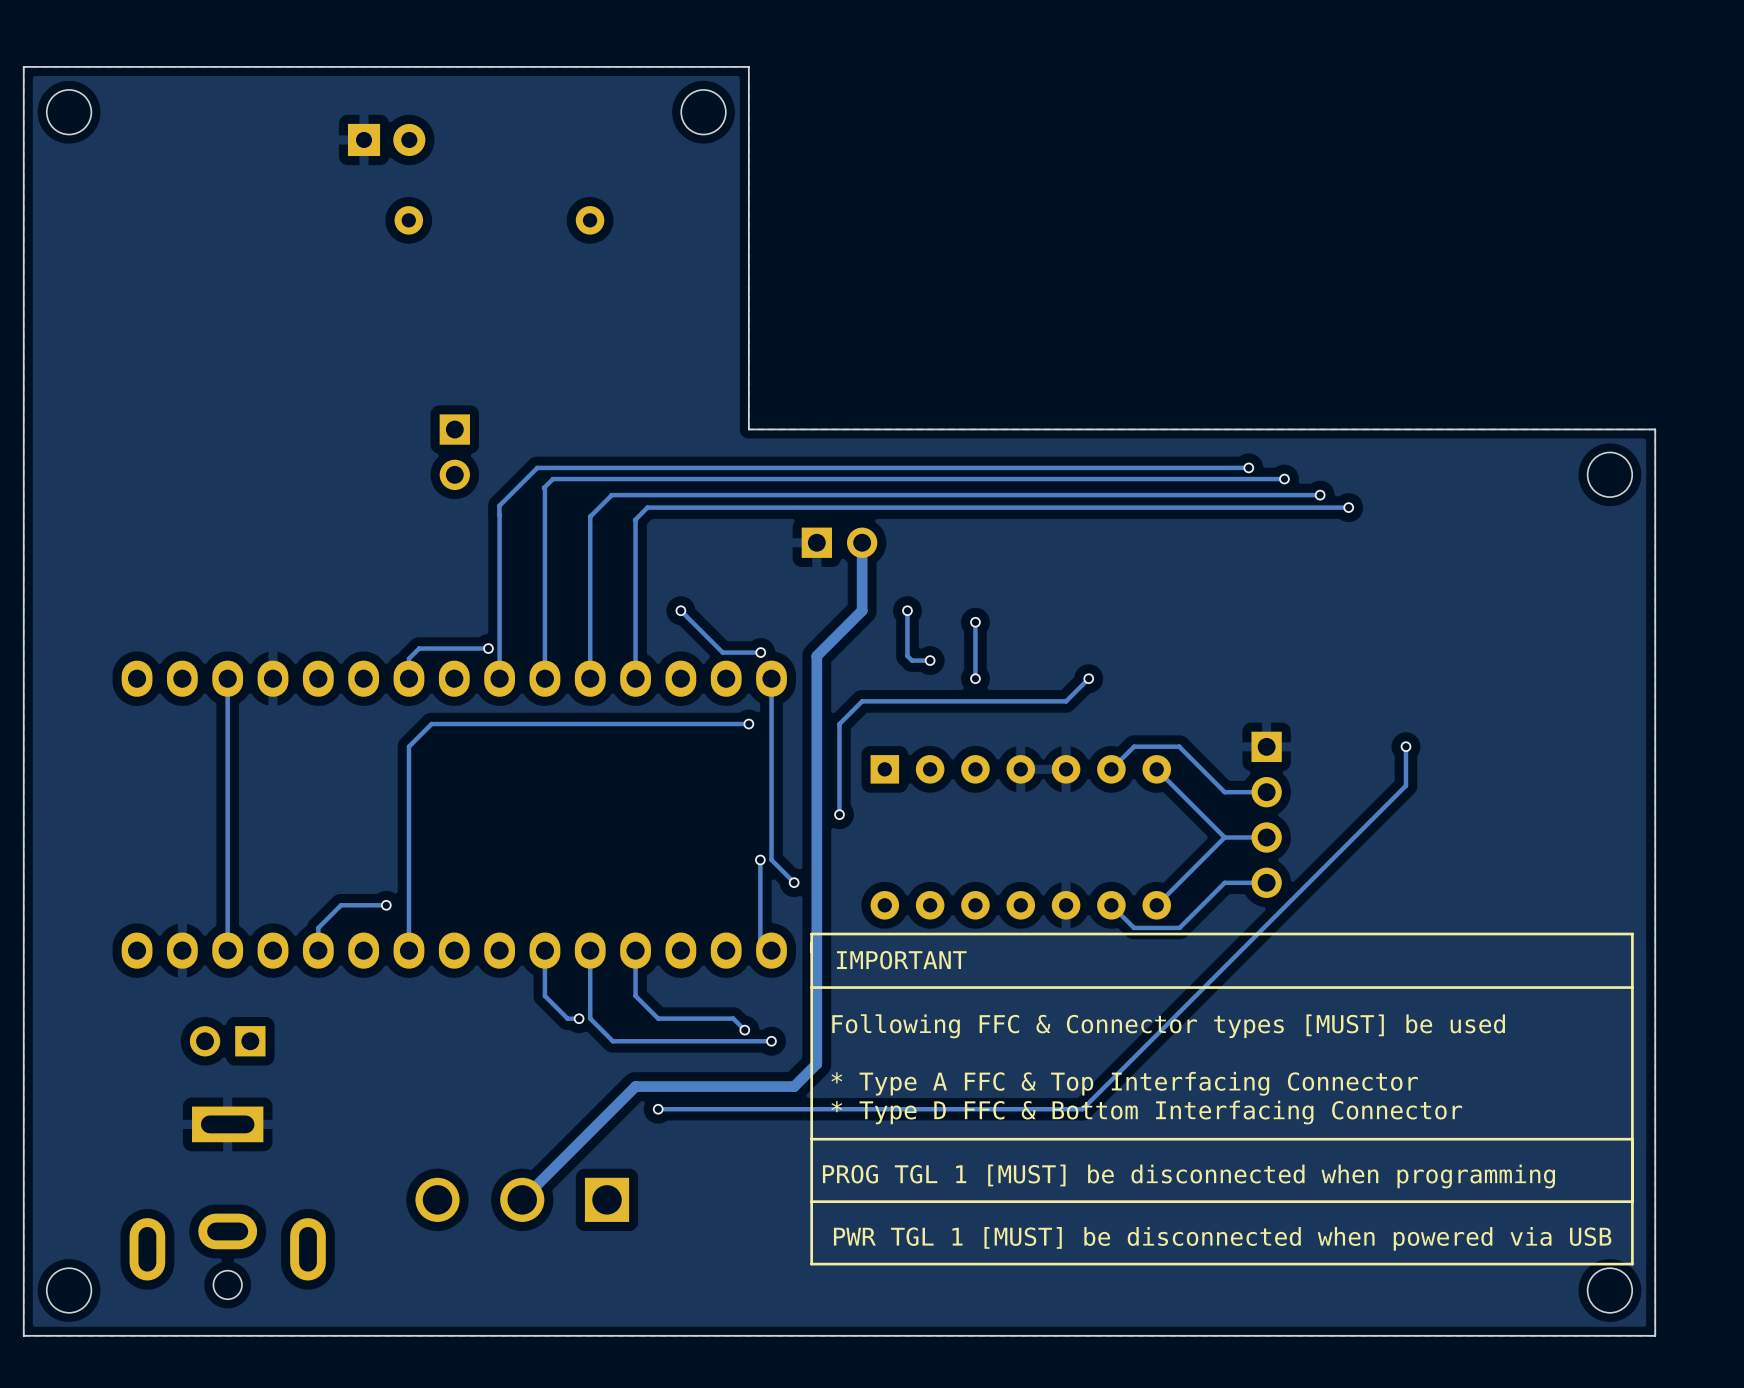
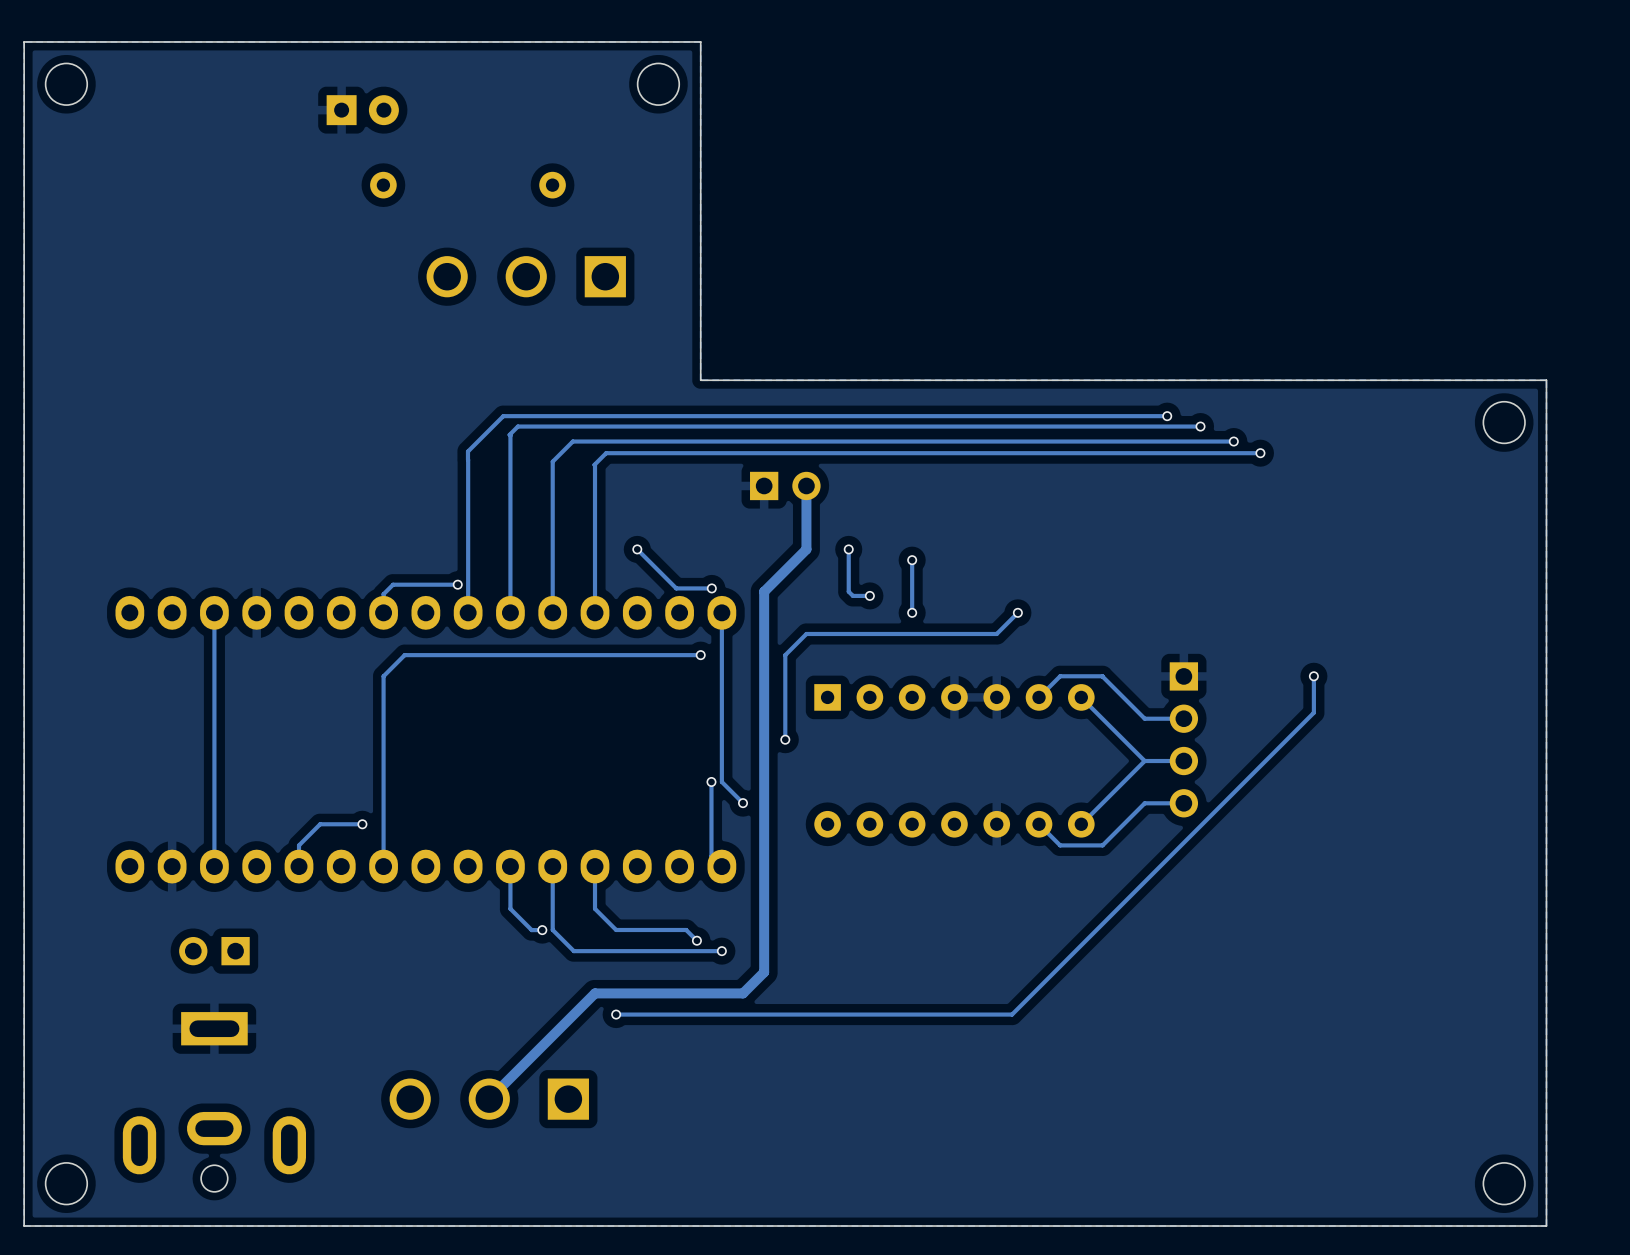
part: none -> (526, 276)
part: (454, 452) -> none
line: (1632, 934) (811, 934) (811, 1264) (1632, 1264) (1632, 934) -> none
text: IMPORTANT (901, 960) -> none
line: (1632, 987) (811, 987) -> none
text: Following FFC & Connector types [MUST] be used (1168, 1026) -> none
text: * Type A FFC & Top Interfacing Connector (1124, 1083) -> none
text: * Type D FFC & Bottom Interfacing Connector (1146, 1112) -> none
line: (1632, 1139) (811, 1139) -> none
text: PROG TGL 1 [MUST] be disconnected when programming (1188, 1176) -> none
line: (1632, 1201) (811, 1201) -> none
text: PWR TGL 1 [MUST] be disconnected when powered via USB (1222, 1238) -> none

